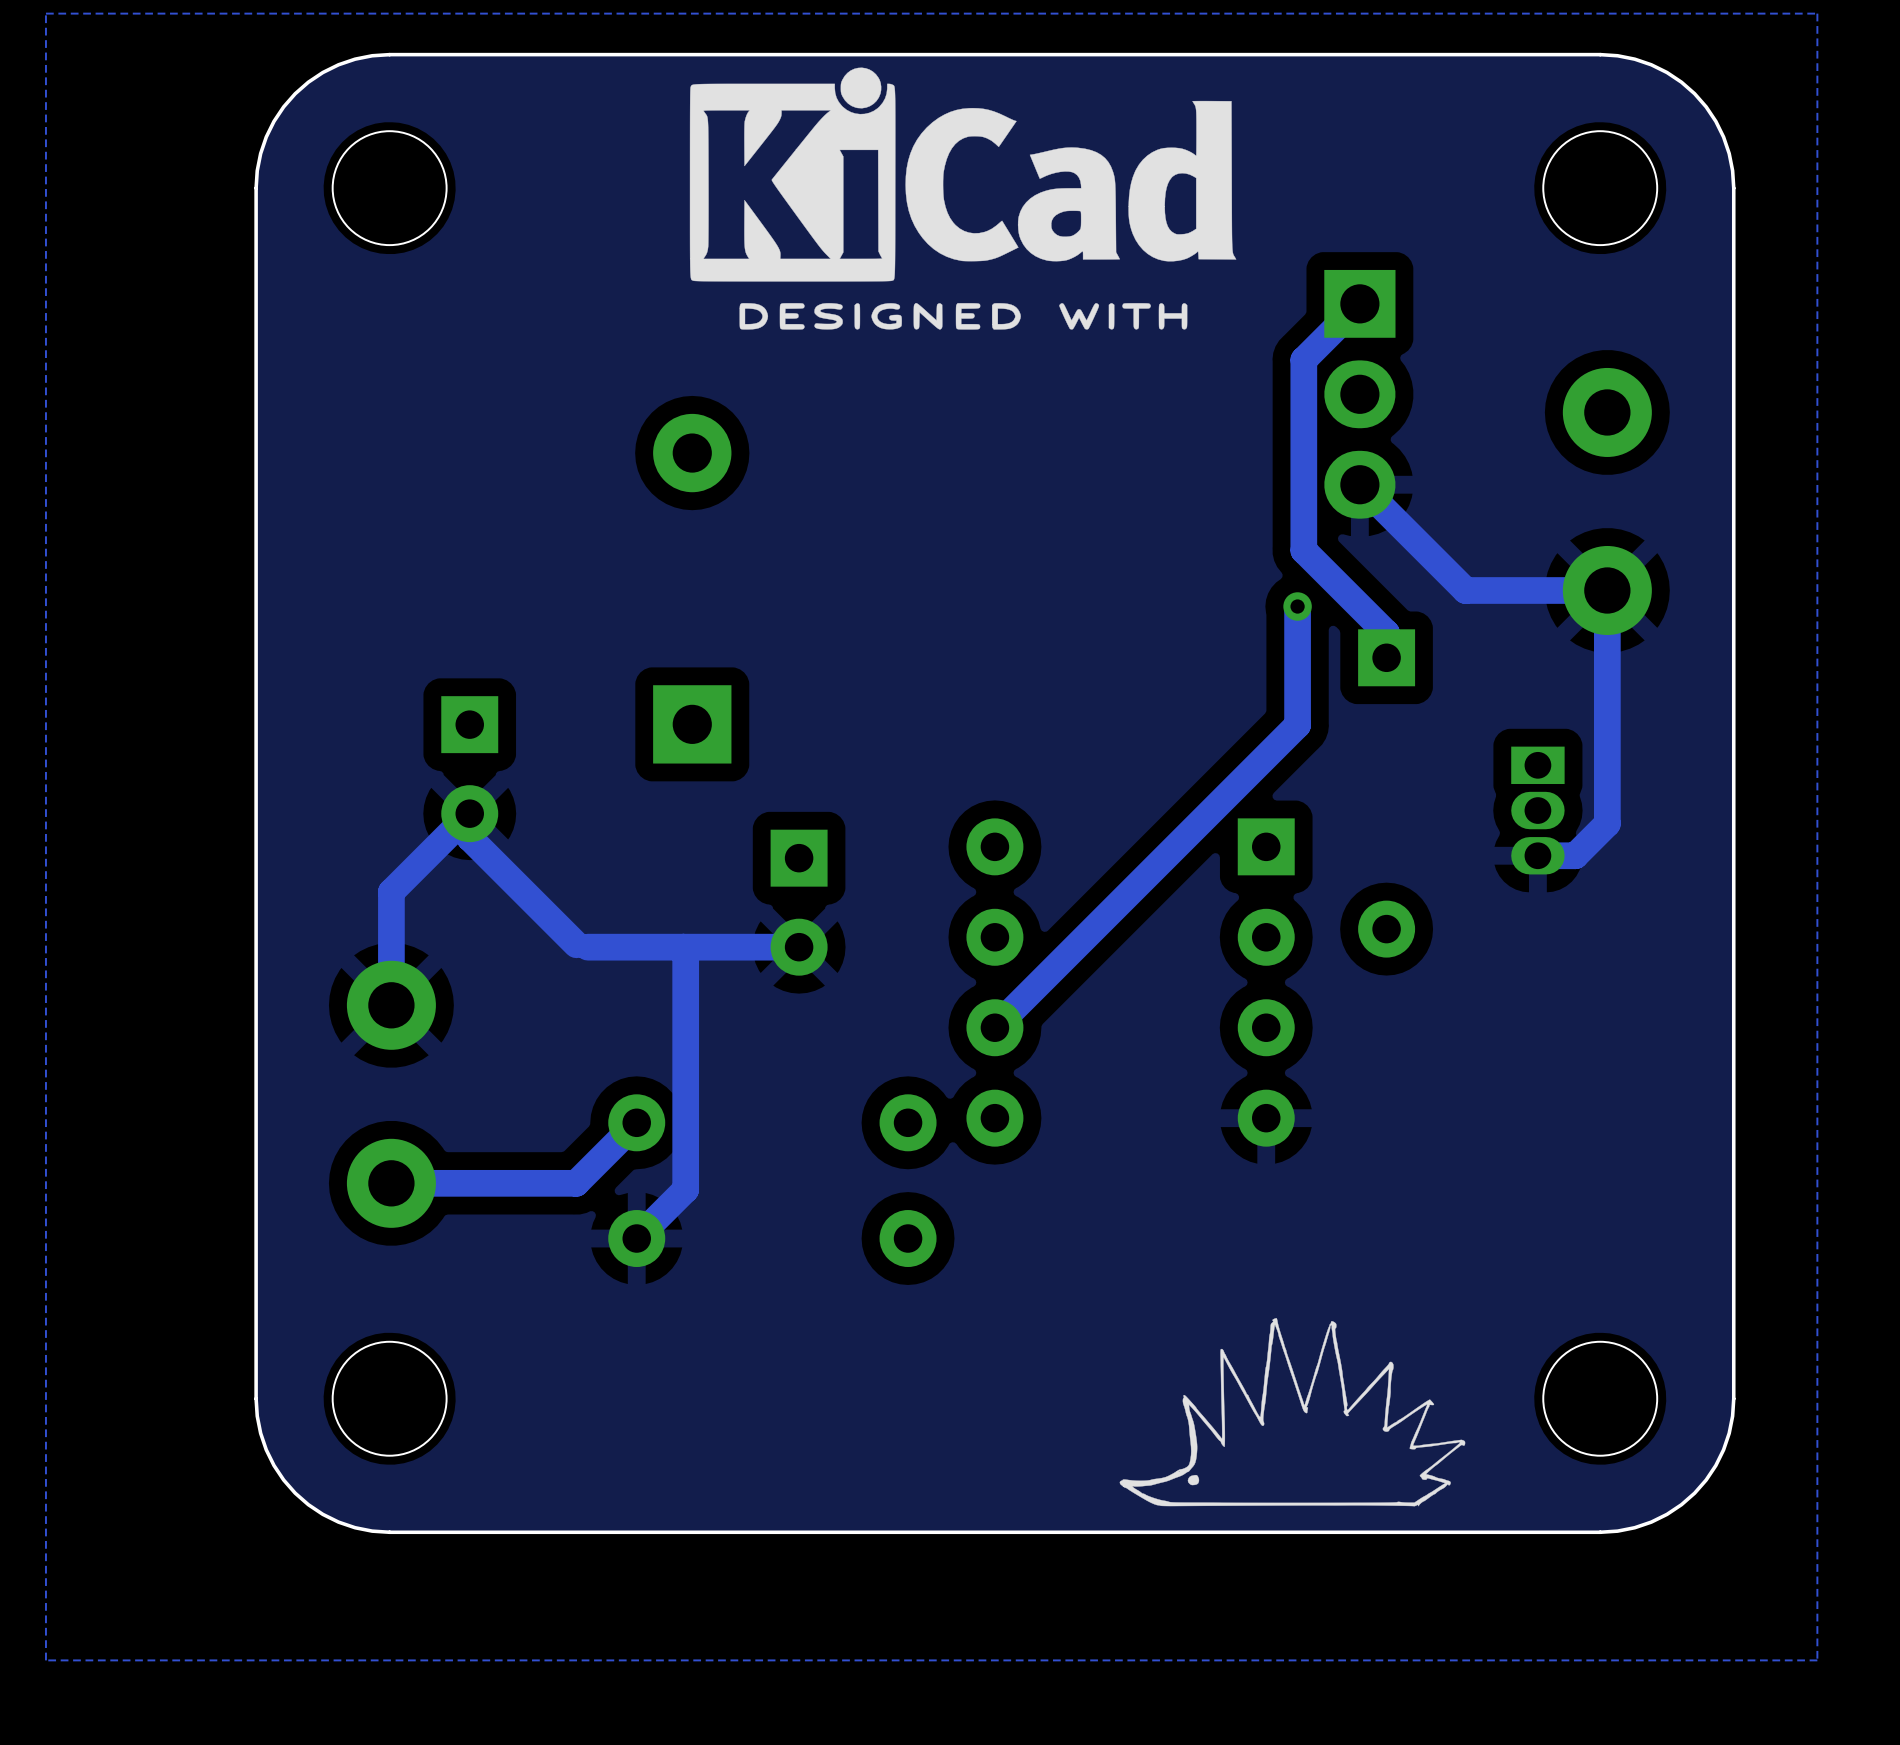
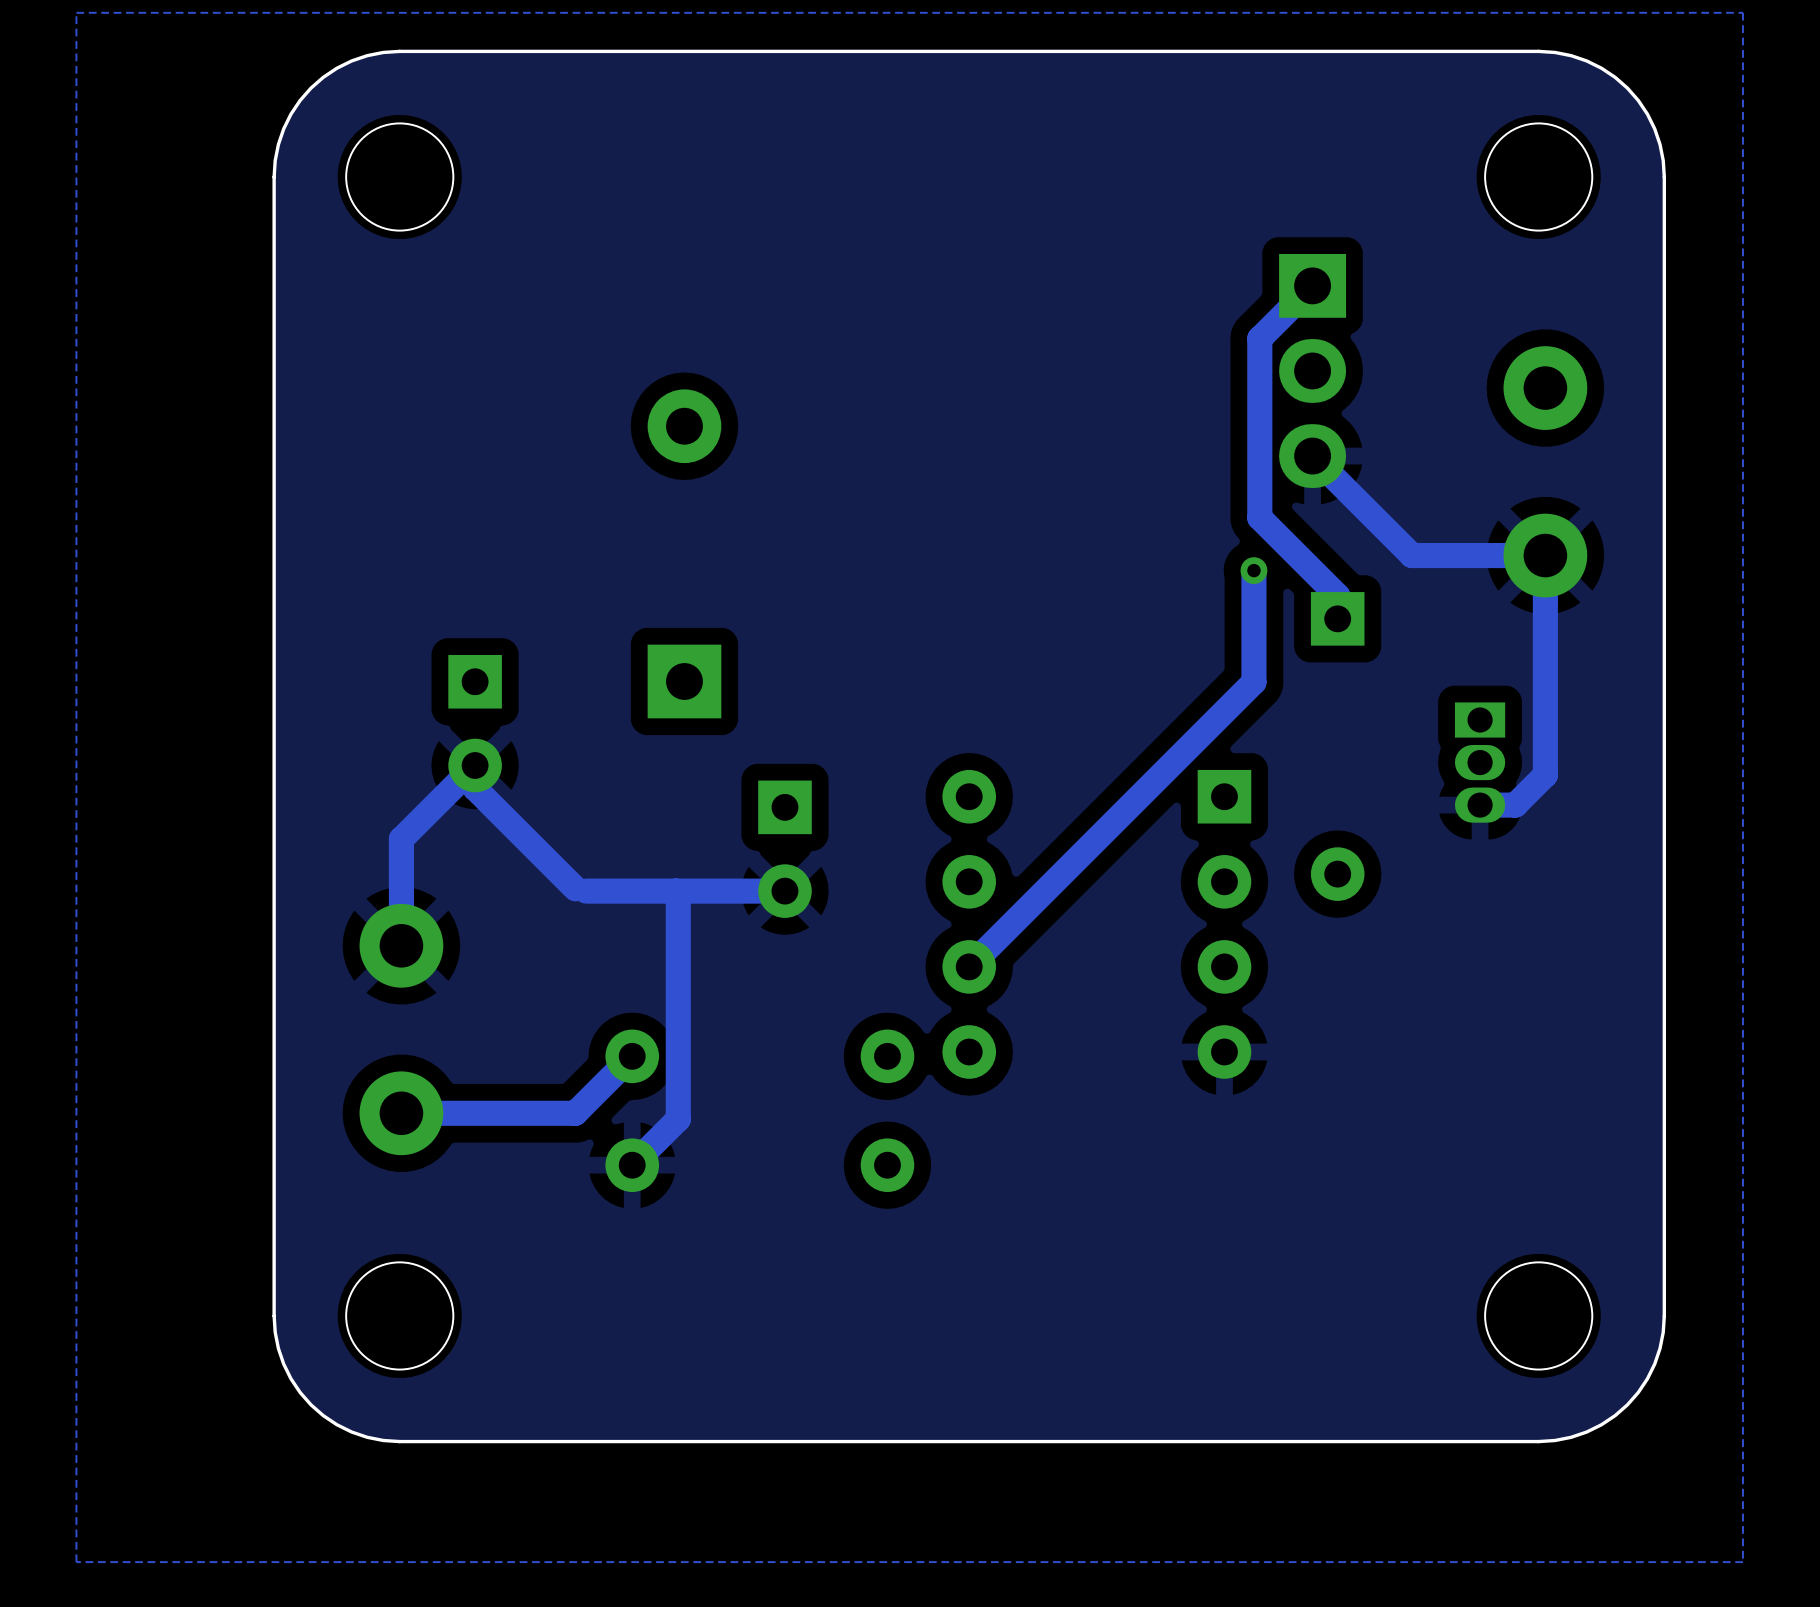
drawing: [689, 67, 1237, 330] -> none
drawing: [1119, 1318, 1466, 1507] -> none

